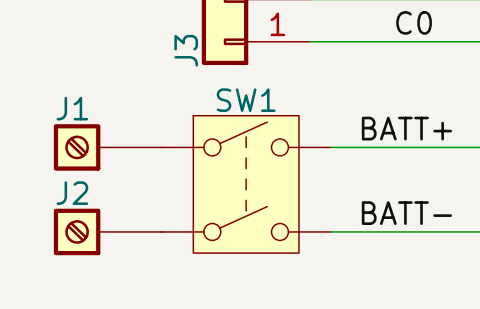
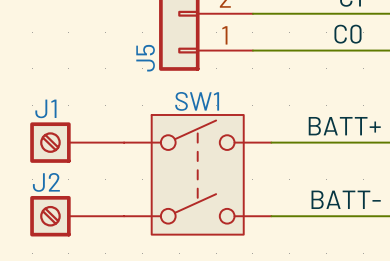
J3 name: J3 (186, 50) -> J5 (145, 58)

